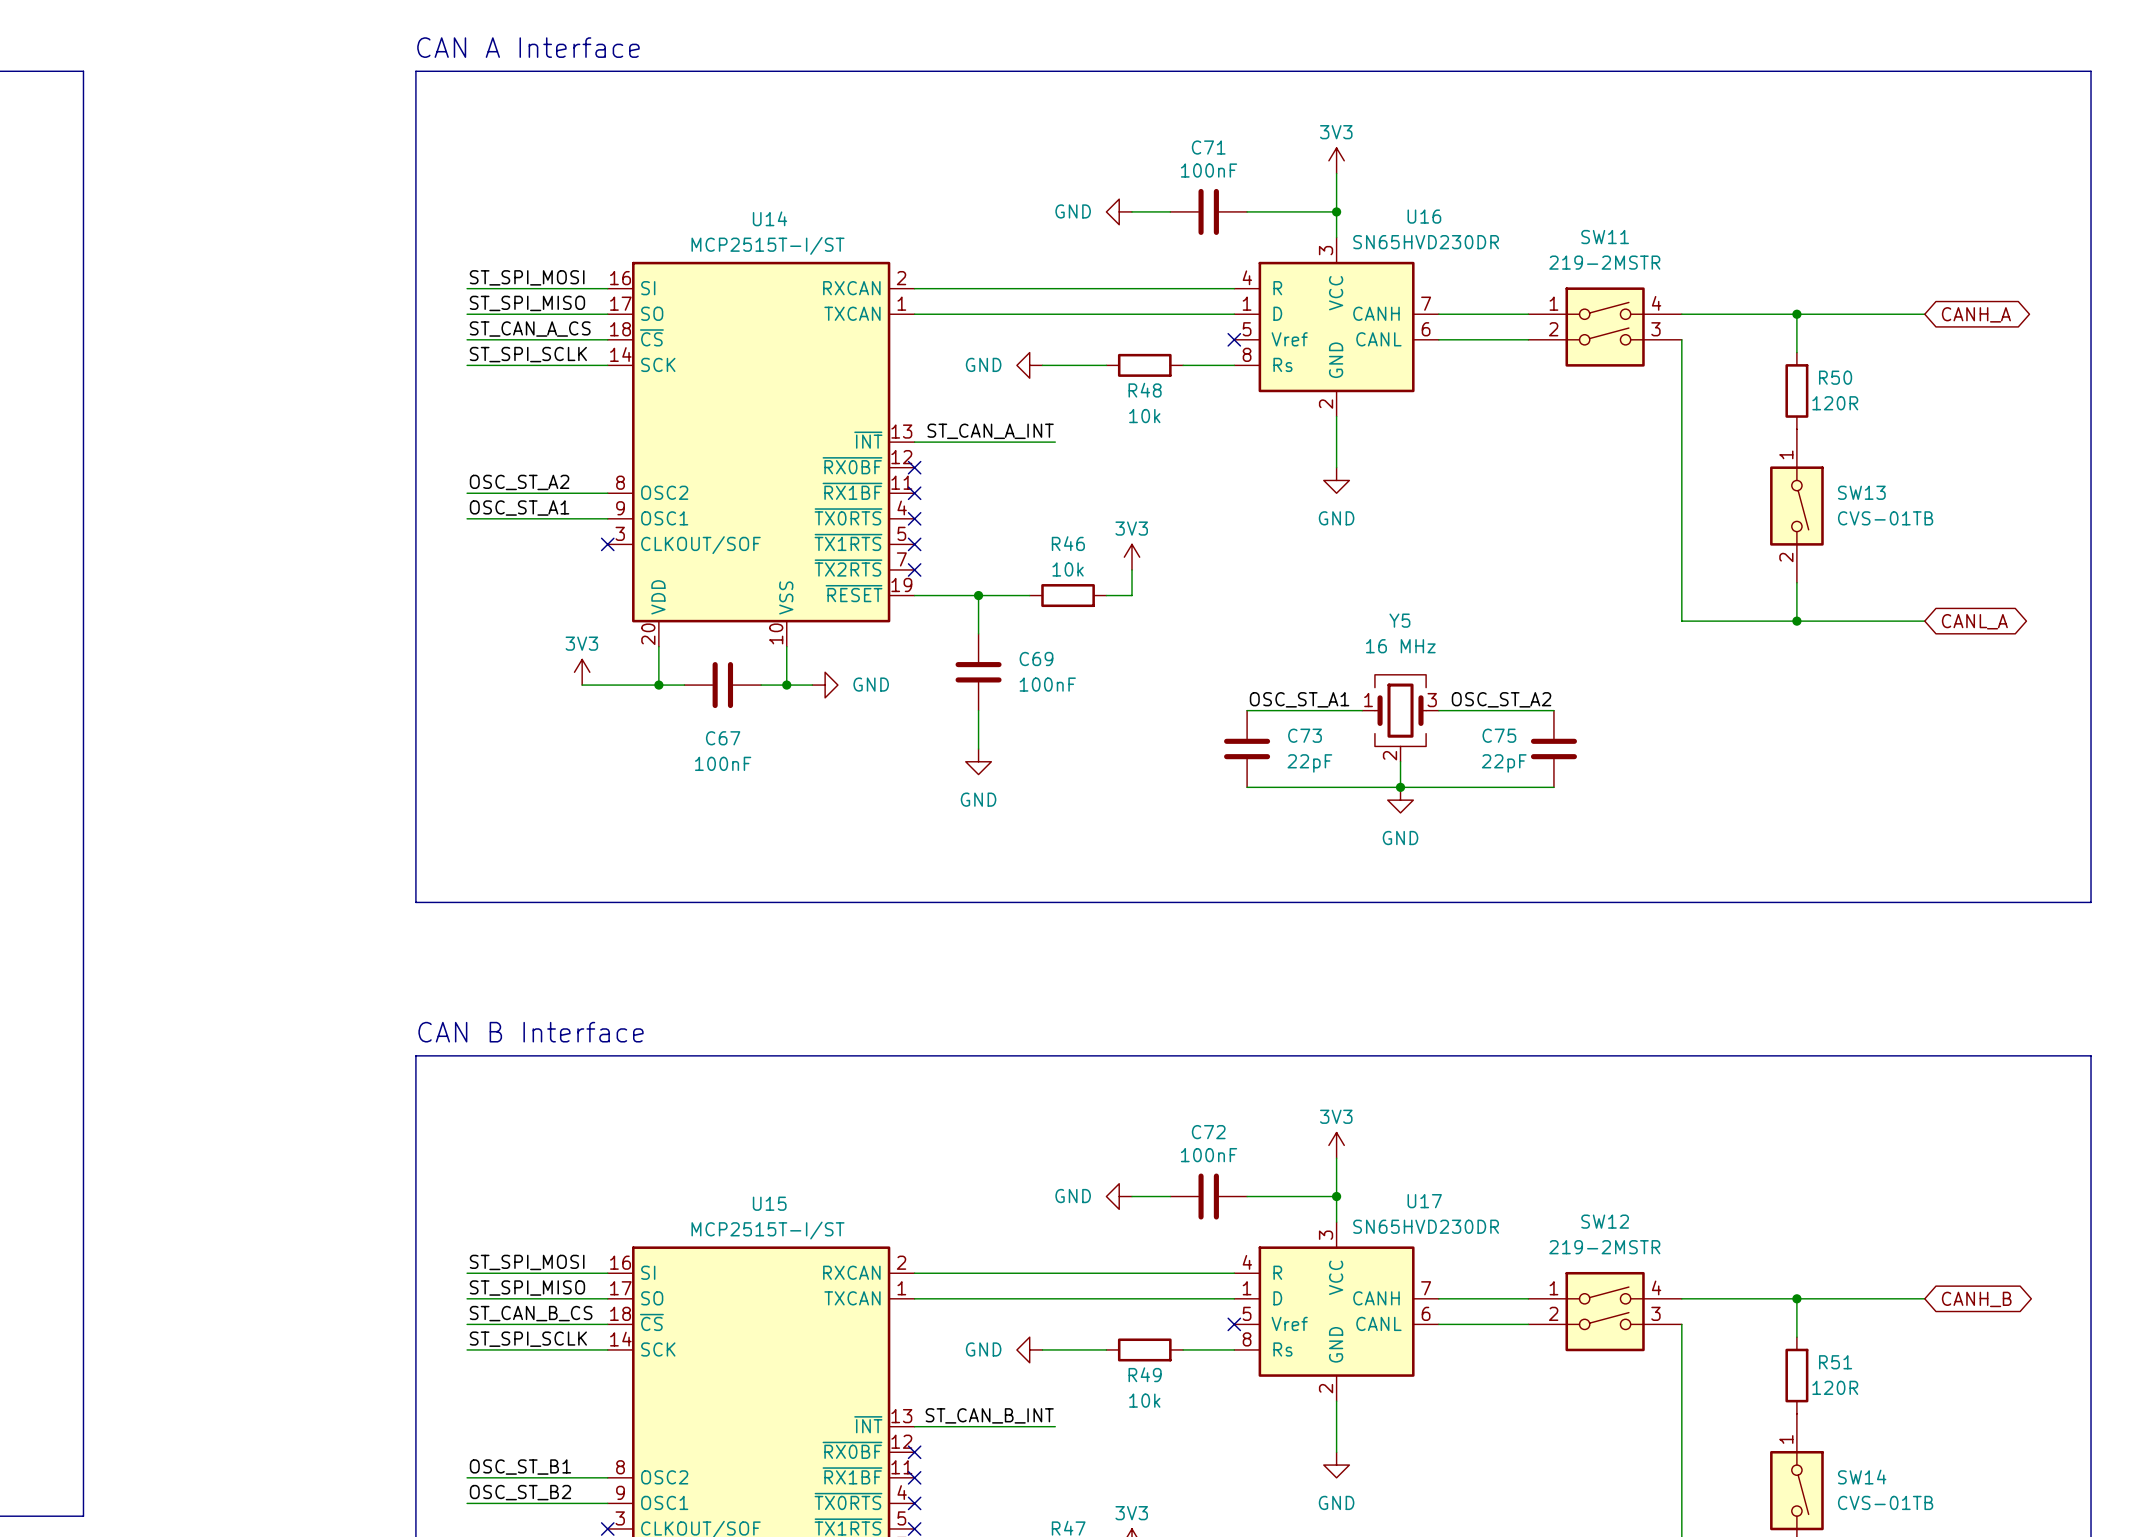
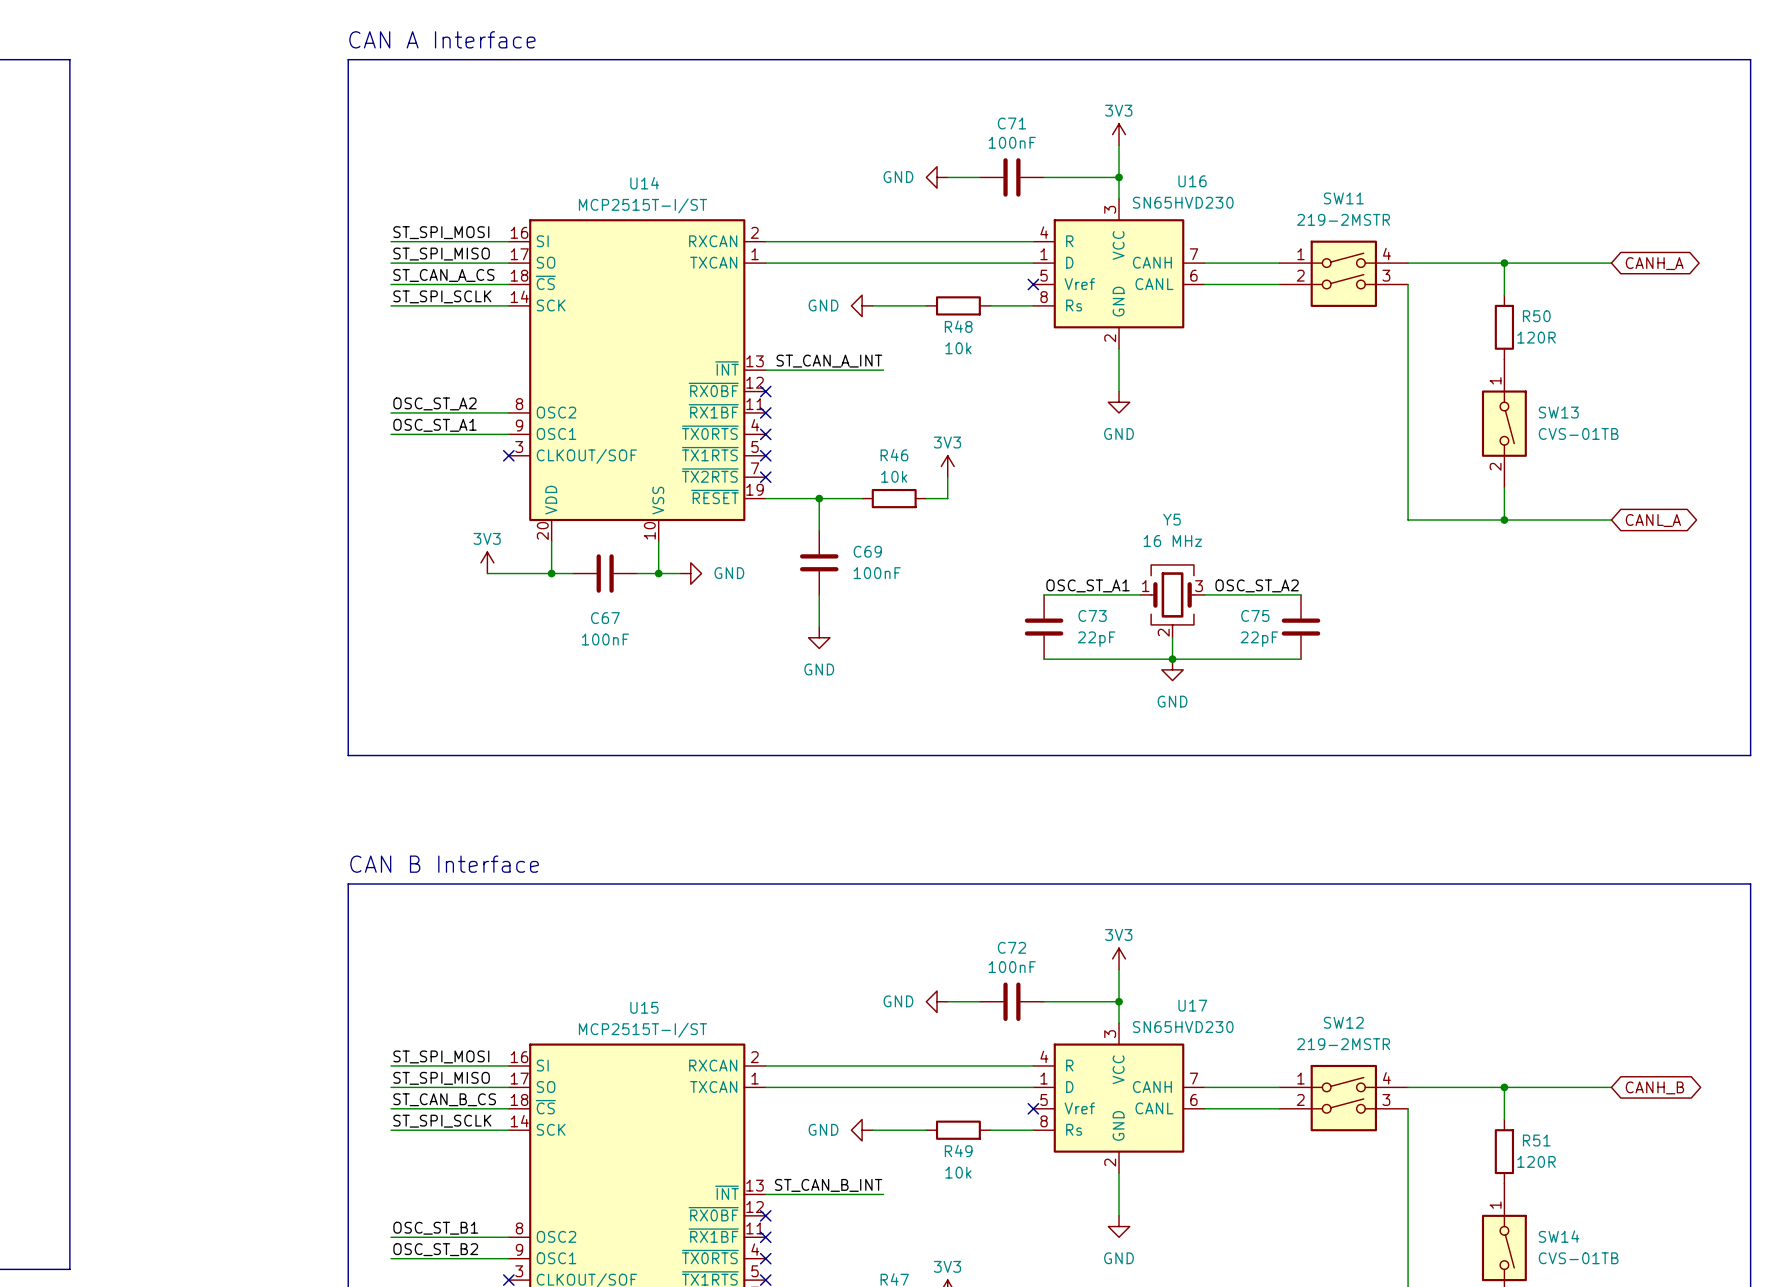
U16 value: SN65HVD230DR (1426, 242) -> SN65HVD230 (1183, 202)
U17 value: SN65HVD230DR (1426, 1226) -> SN65HVD230 (1183, 1027)

